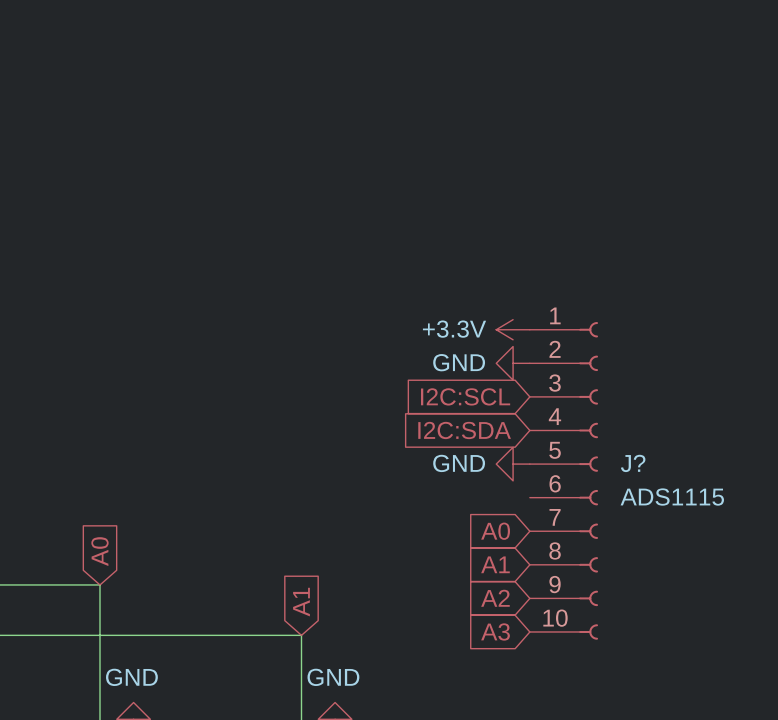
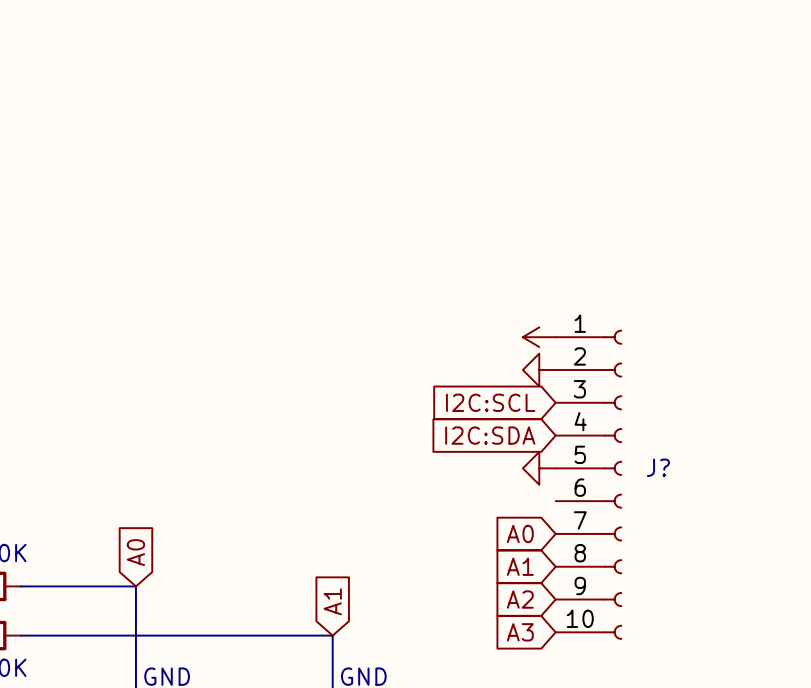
power symbol text: +3.3V (454, 329) -> none
power symbol text: GND (459, 362) -> none
power symbol text: GND (459, 463) -> none
J? value: ADS1115 (672, 497) -> none

